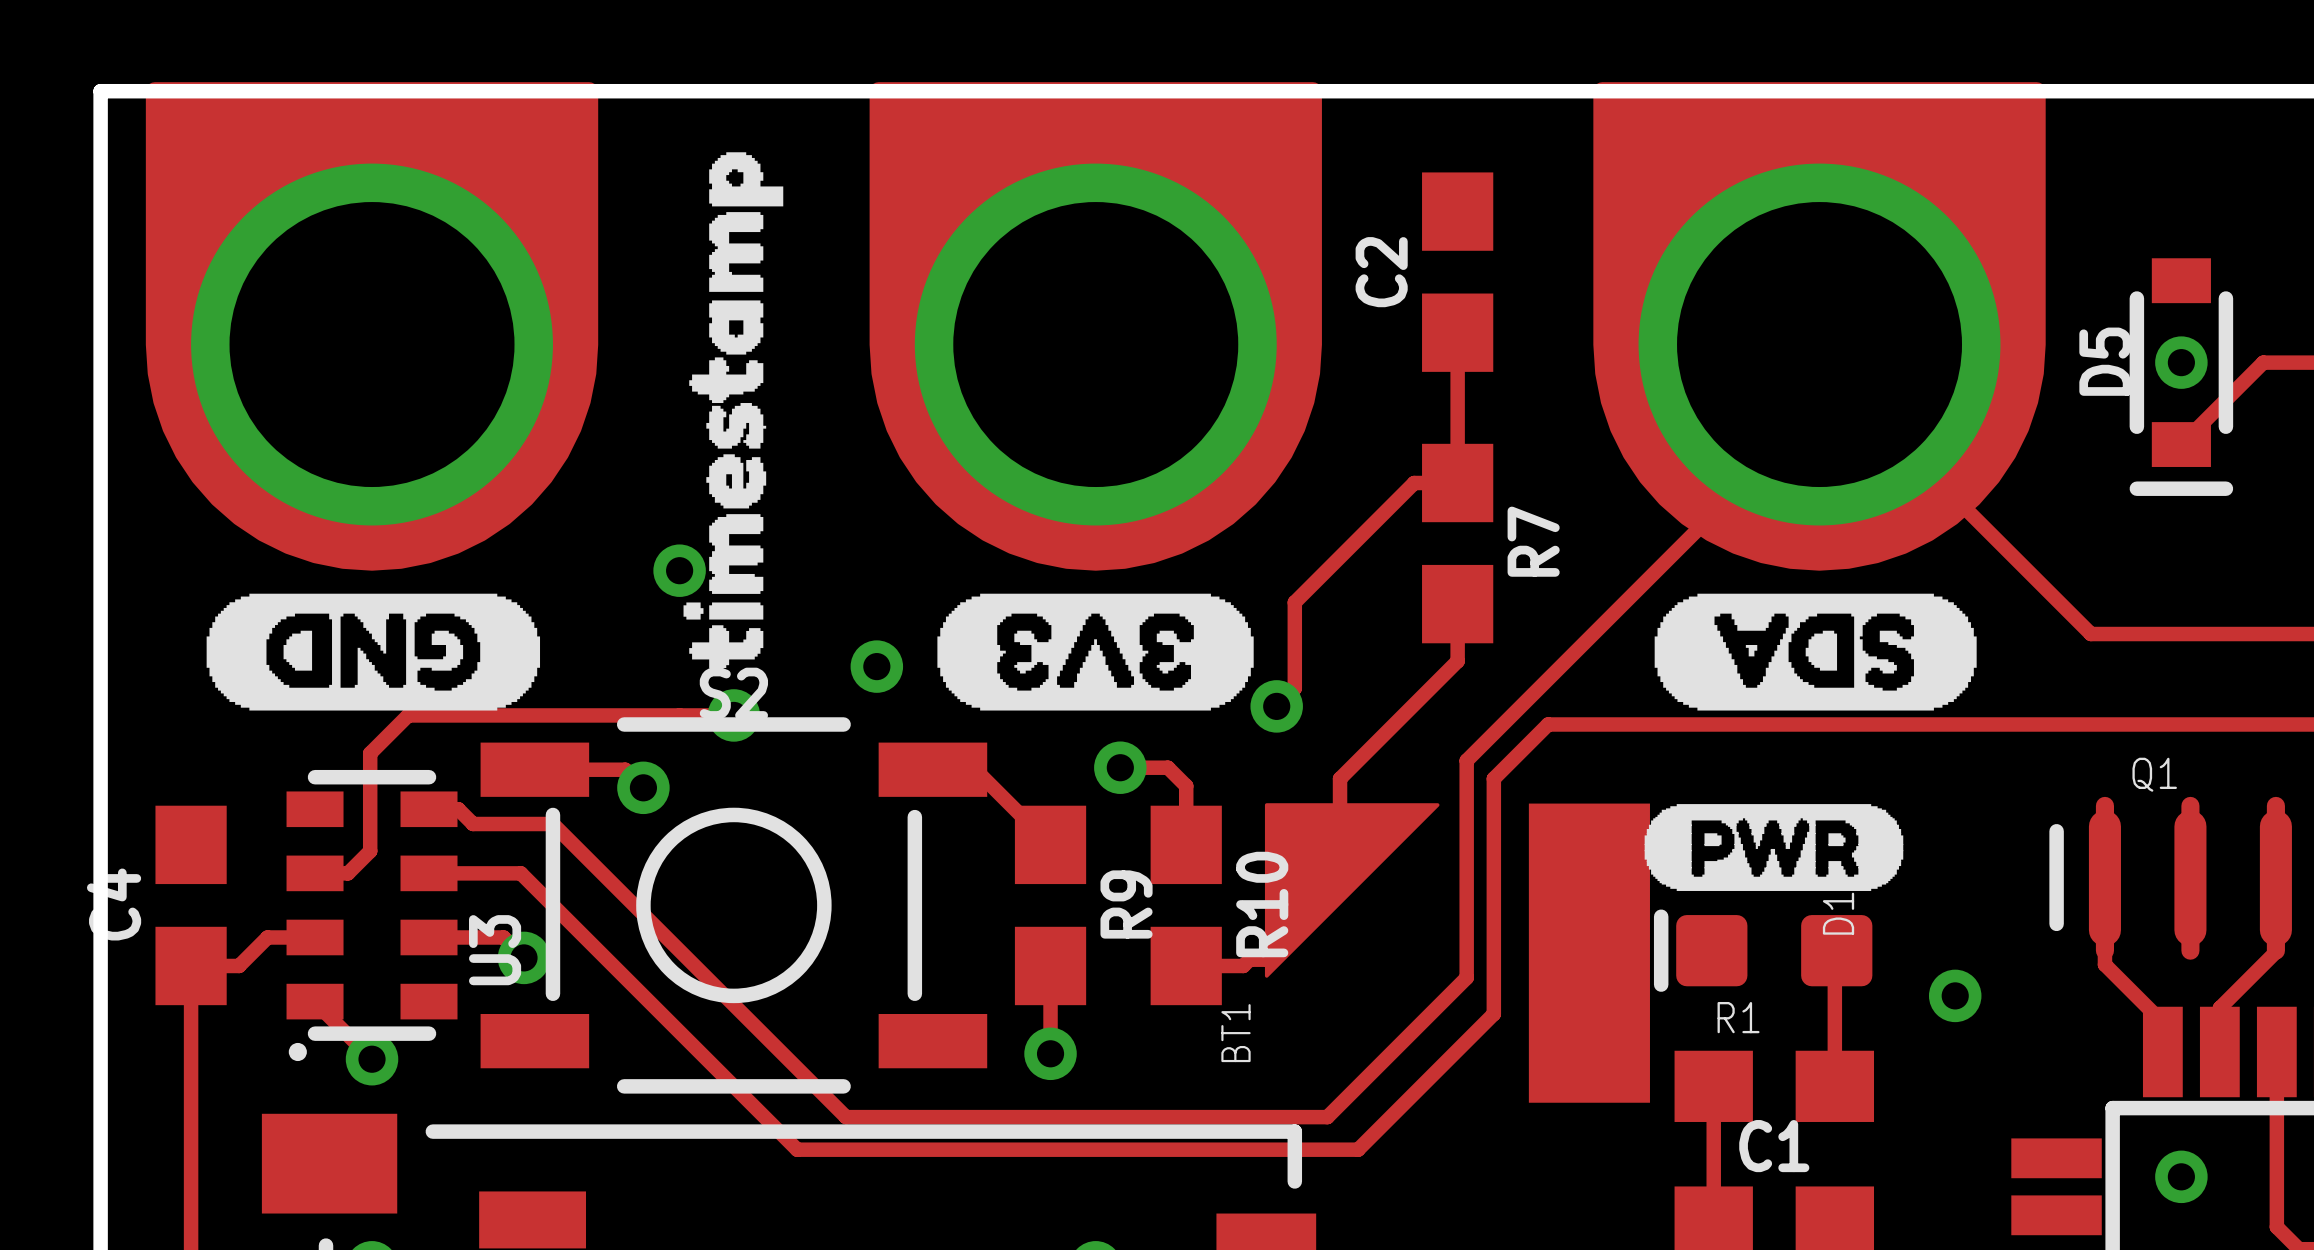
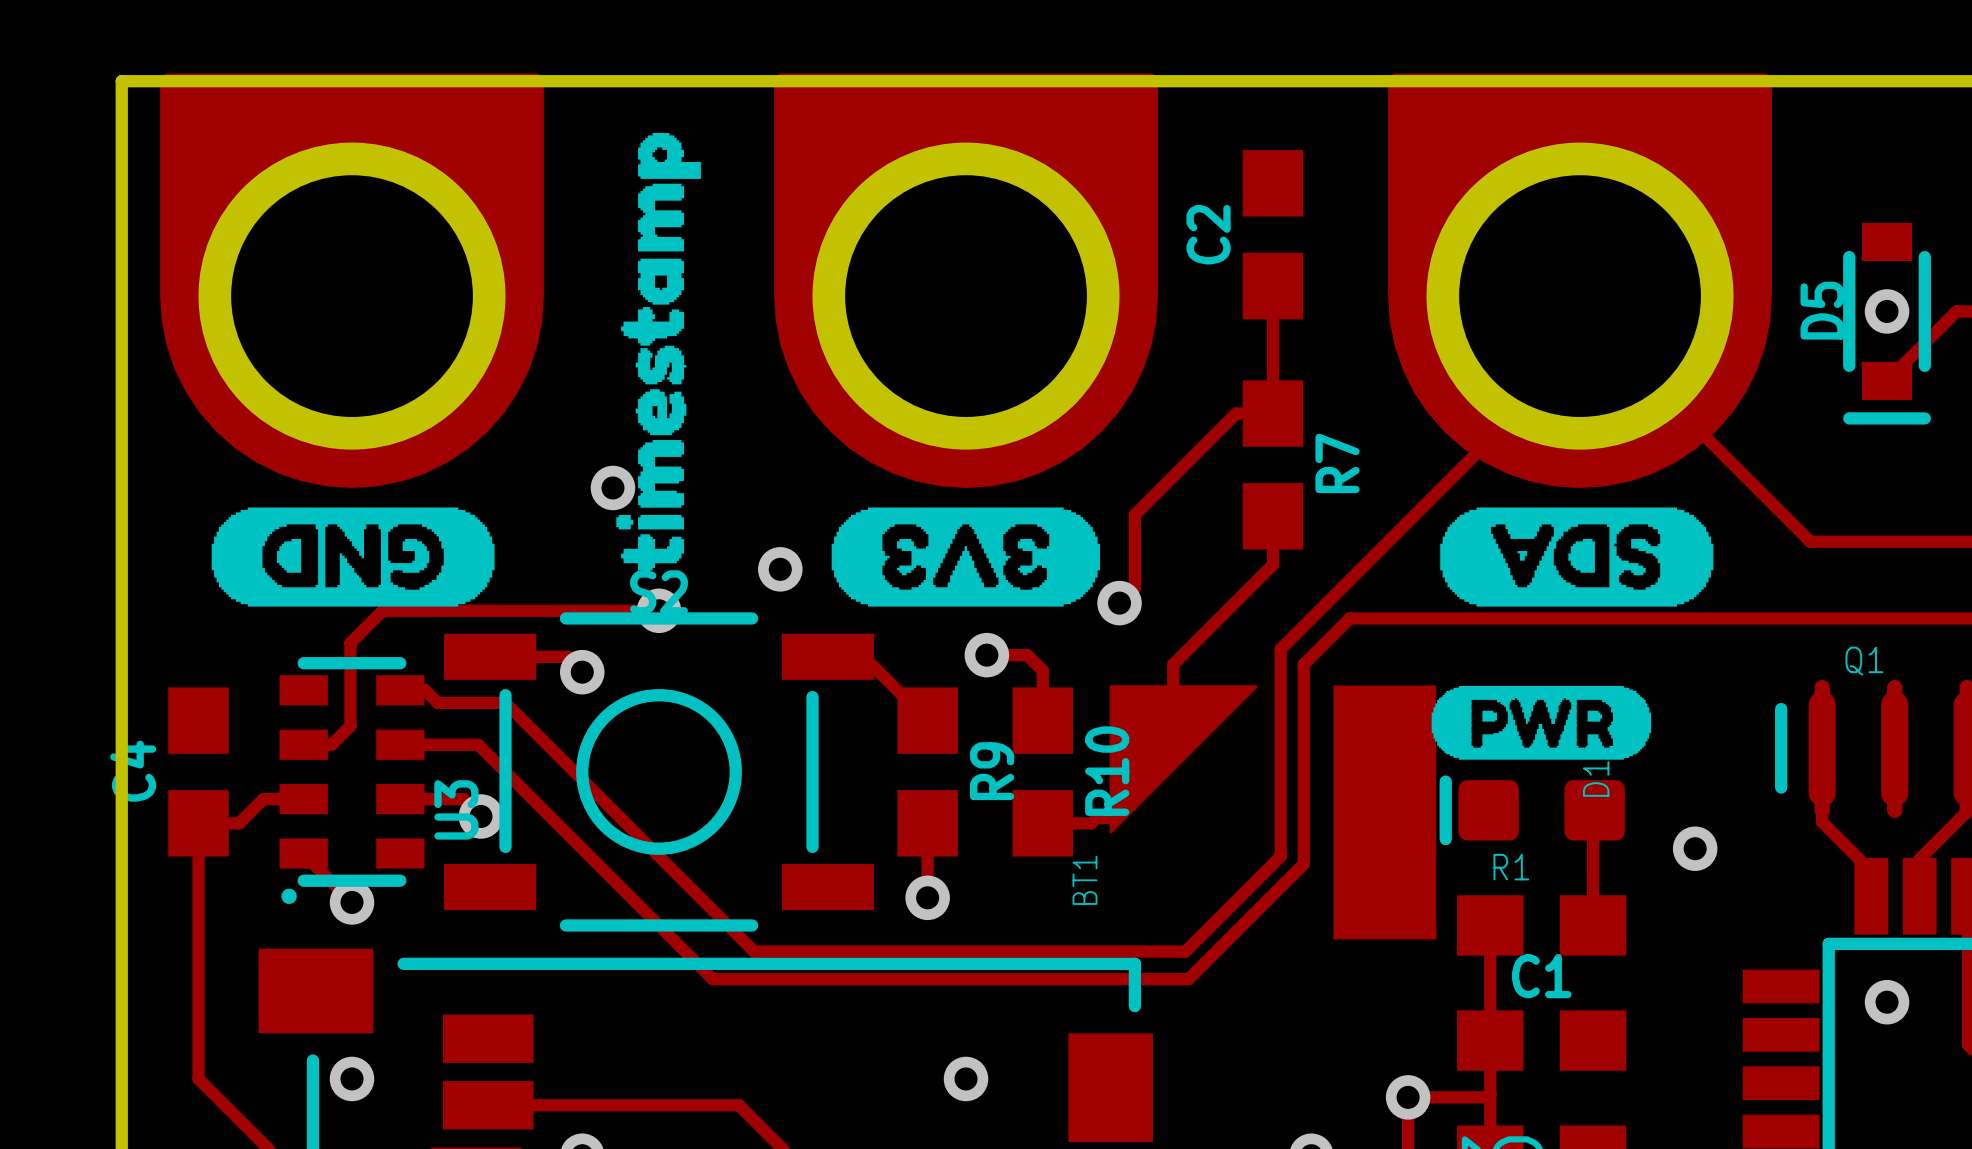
track: (1466, 977) (1327, 1117) -> (1280, 833) (1280, 856) (1185, 951) (1162, 951)

